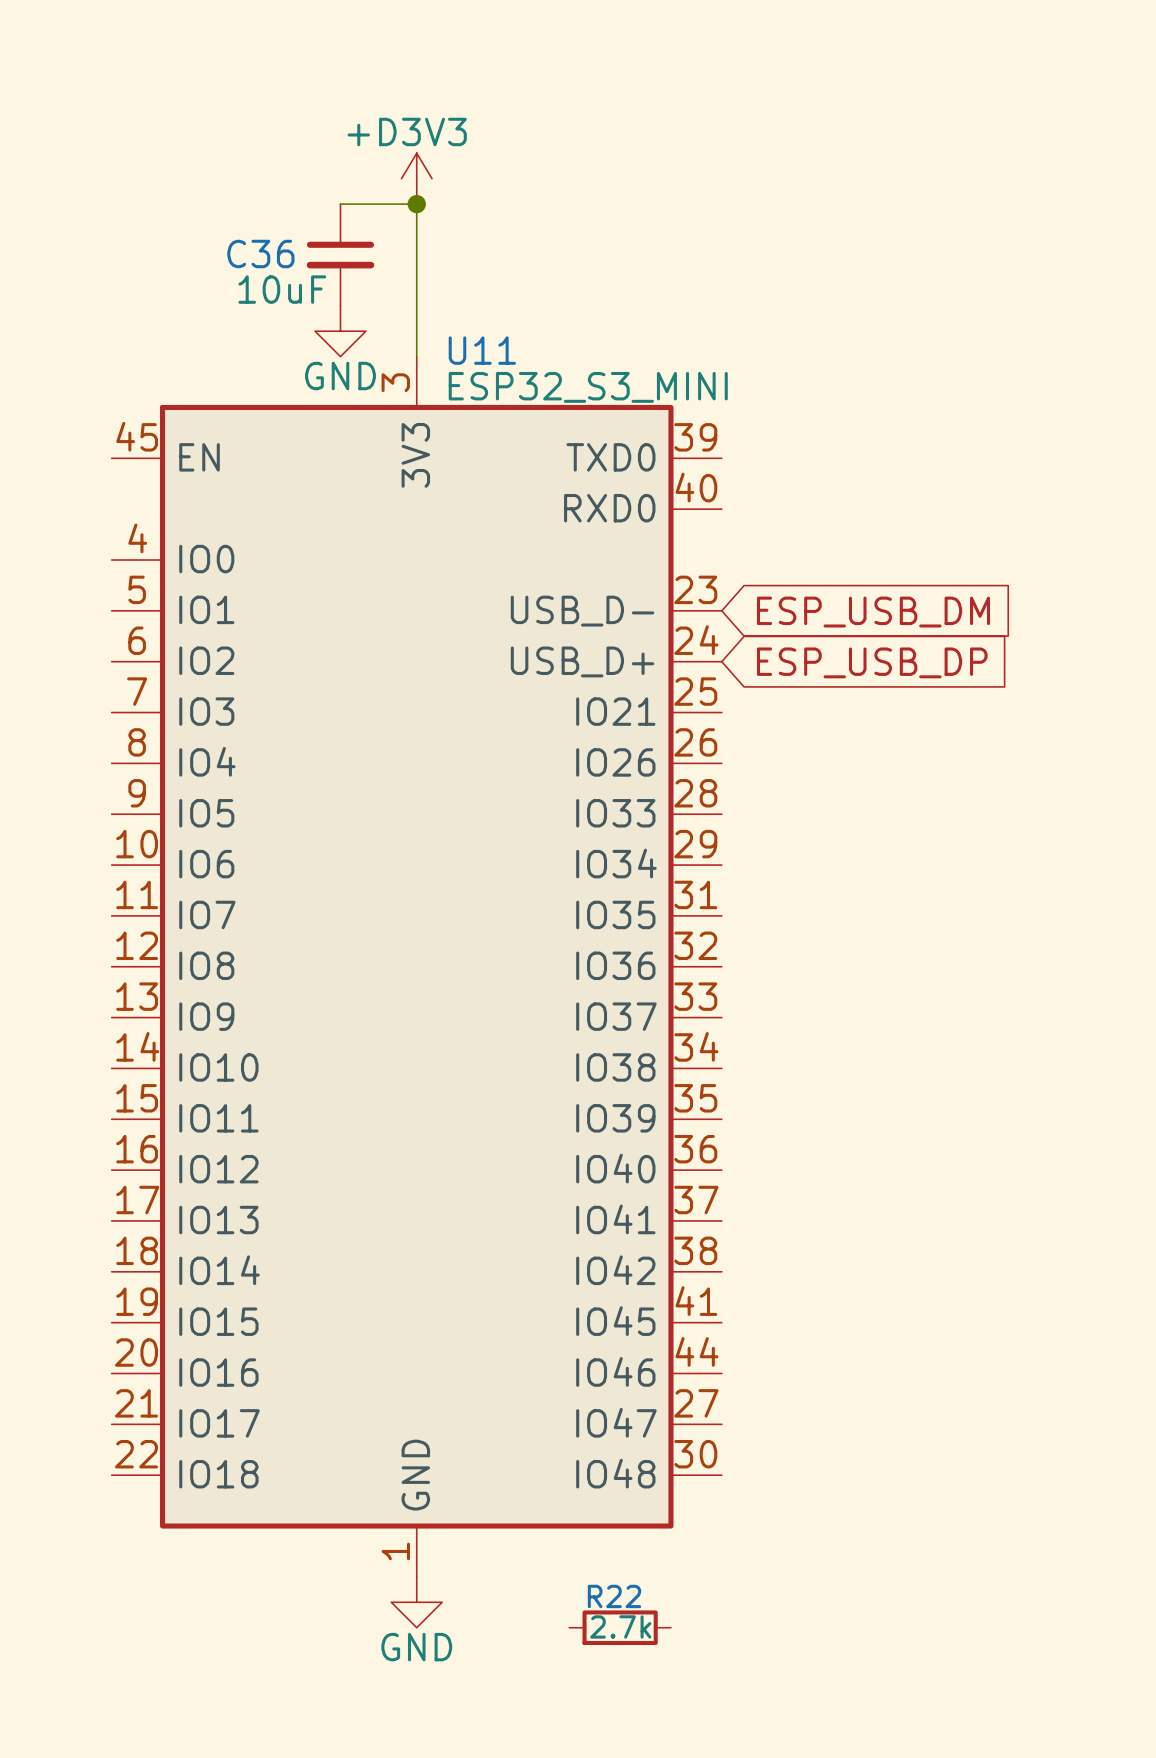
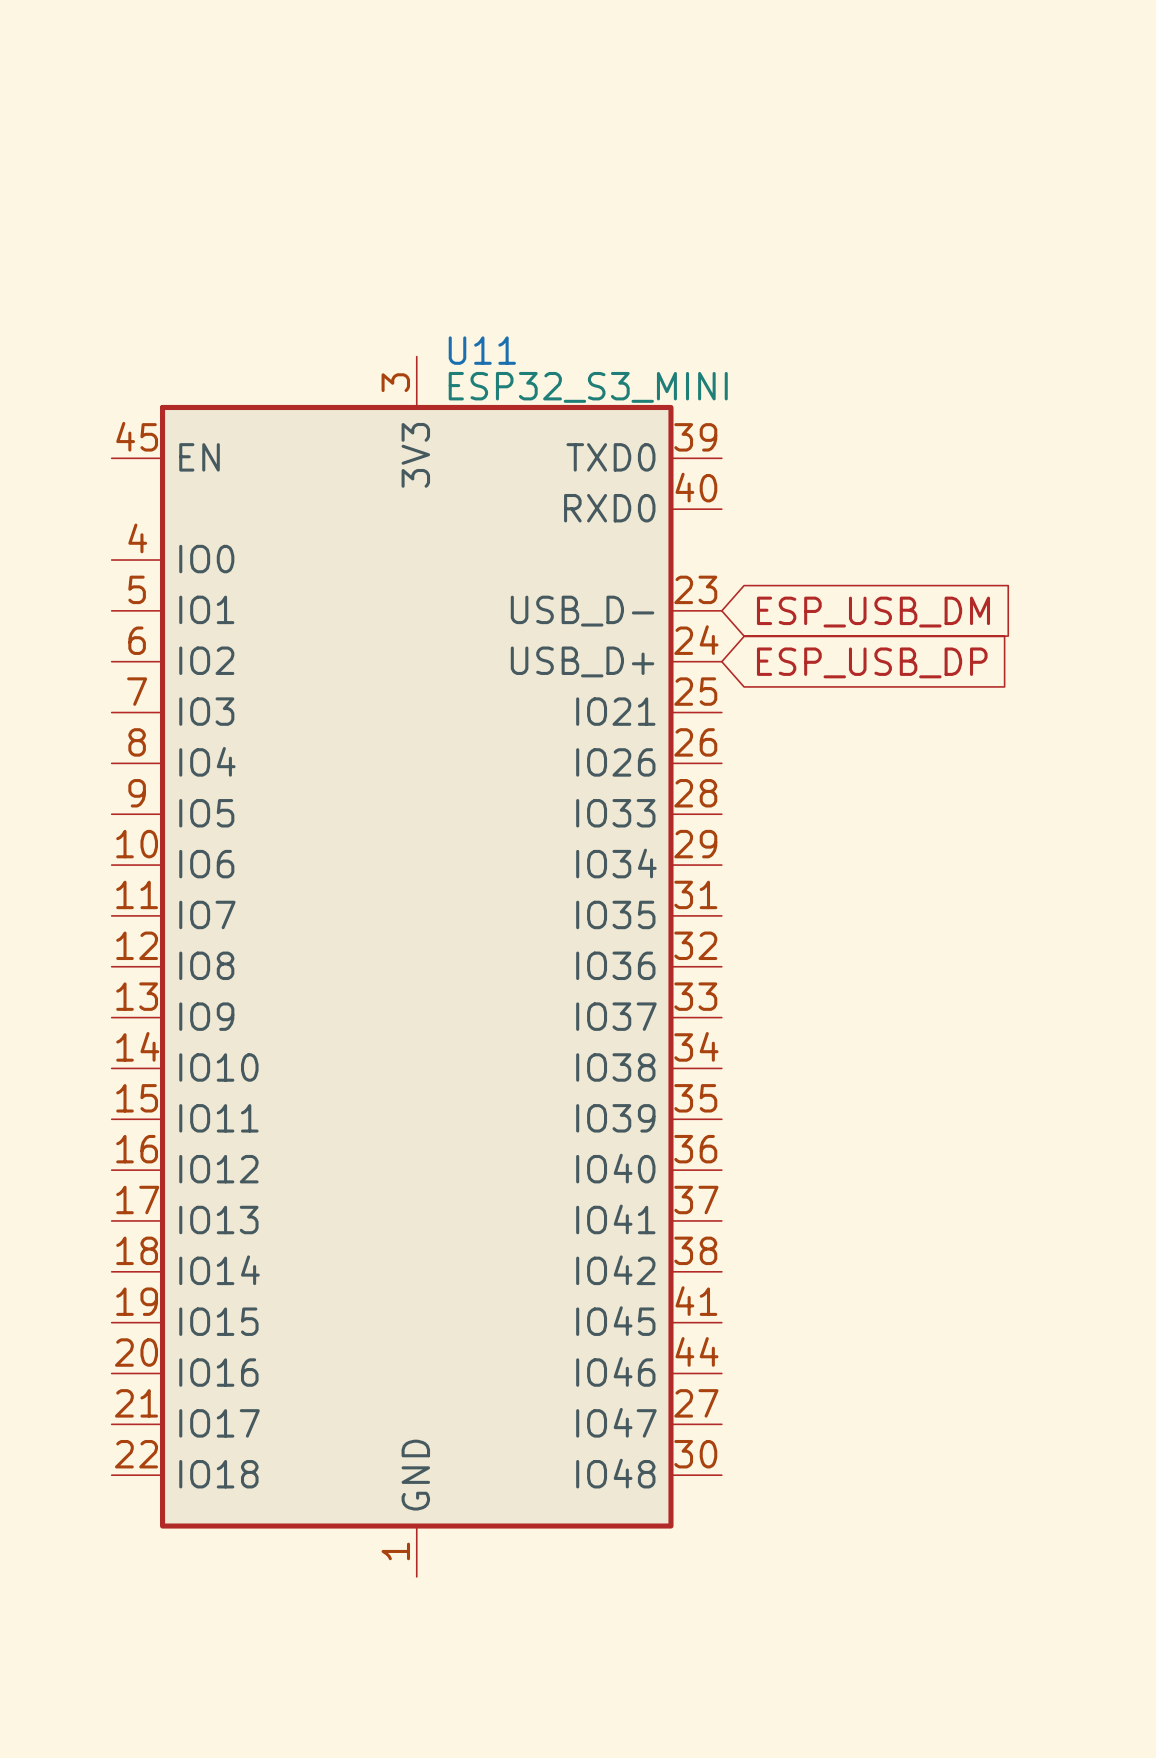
power symbol: +D3V3 (416, 178) -> none
wire: (340, 204) (416, 204) (416, 356) -> none
junction: (416, 204) -> none
C36: 10uF (340, 254) -> none
power symbol: GND (340, 331) -> none
power symbol: GND (416, 1602) -> none
R22: 2.7k (620, 1627) -> none

